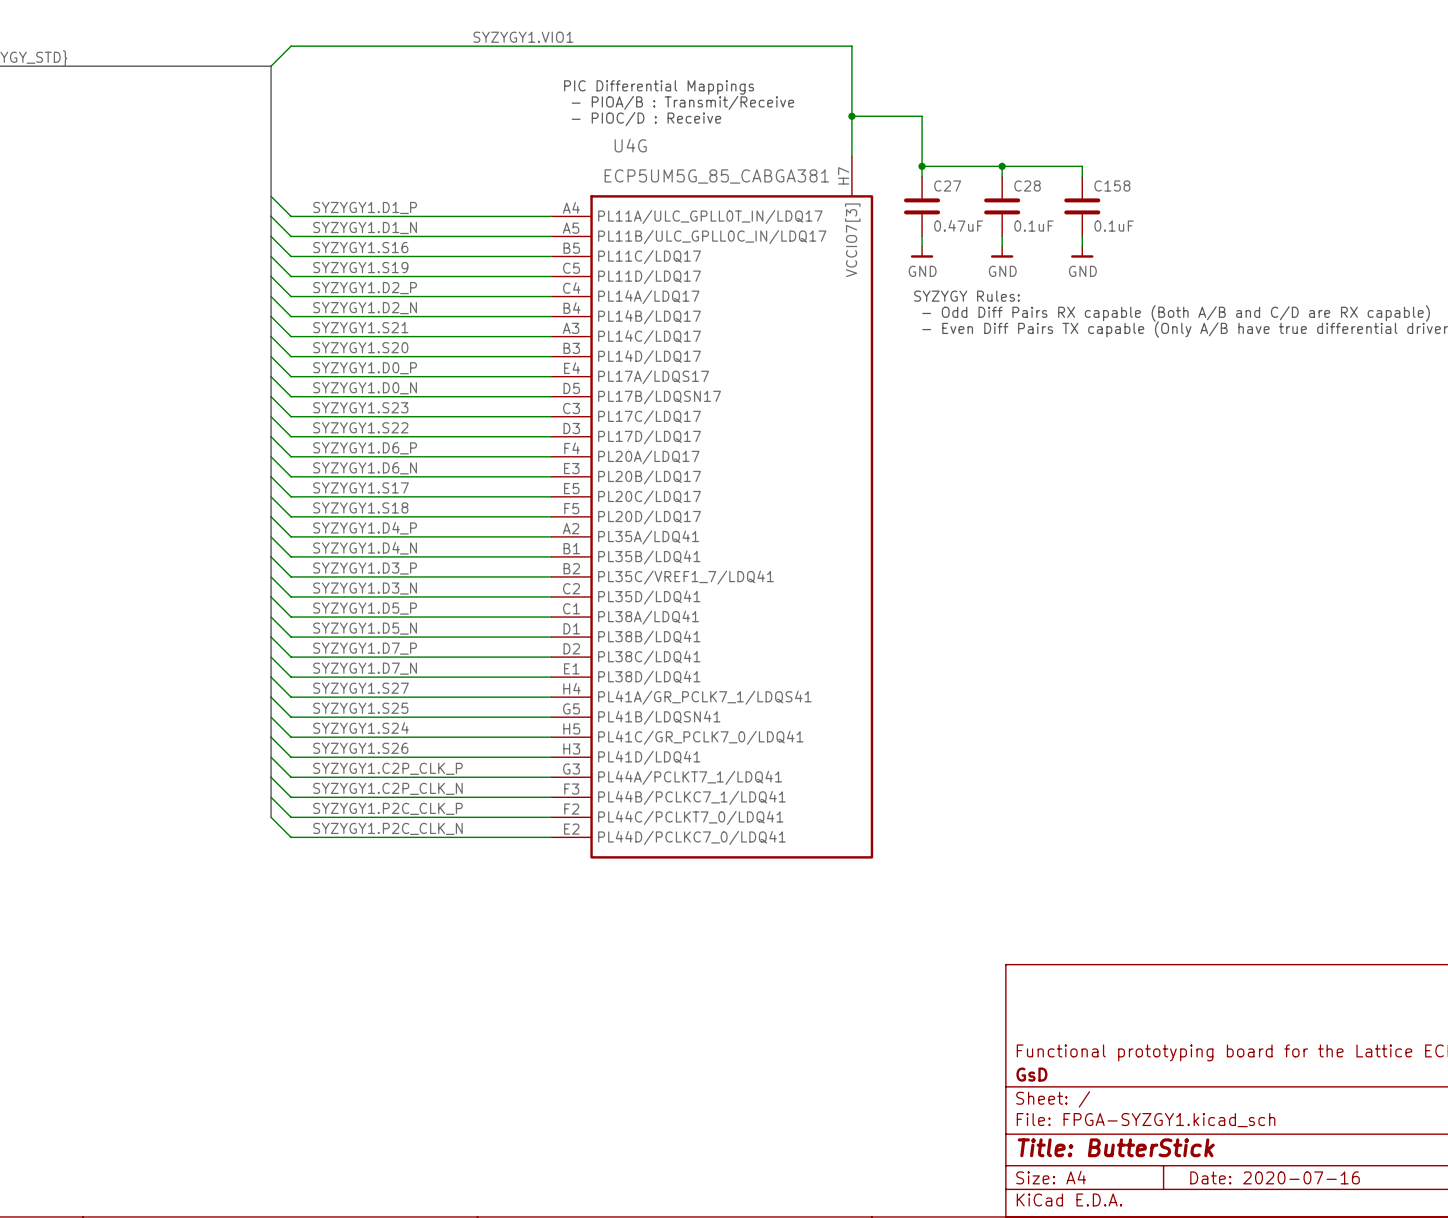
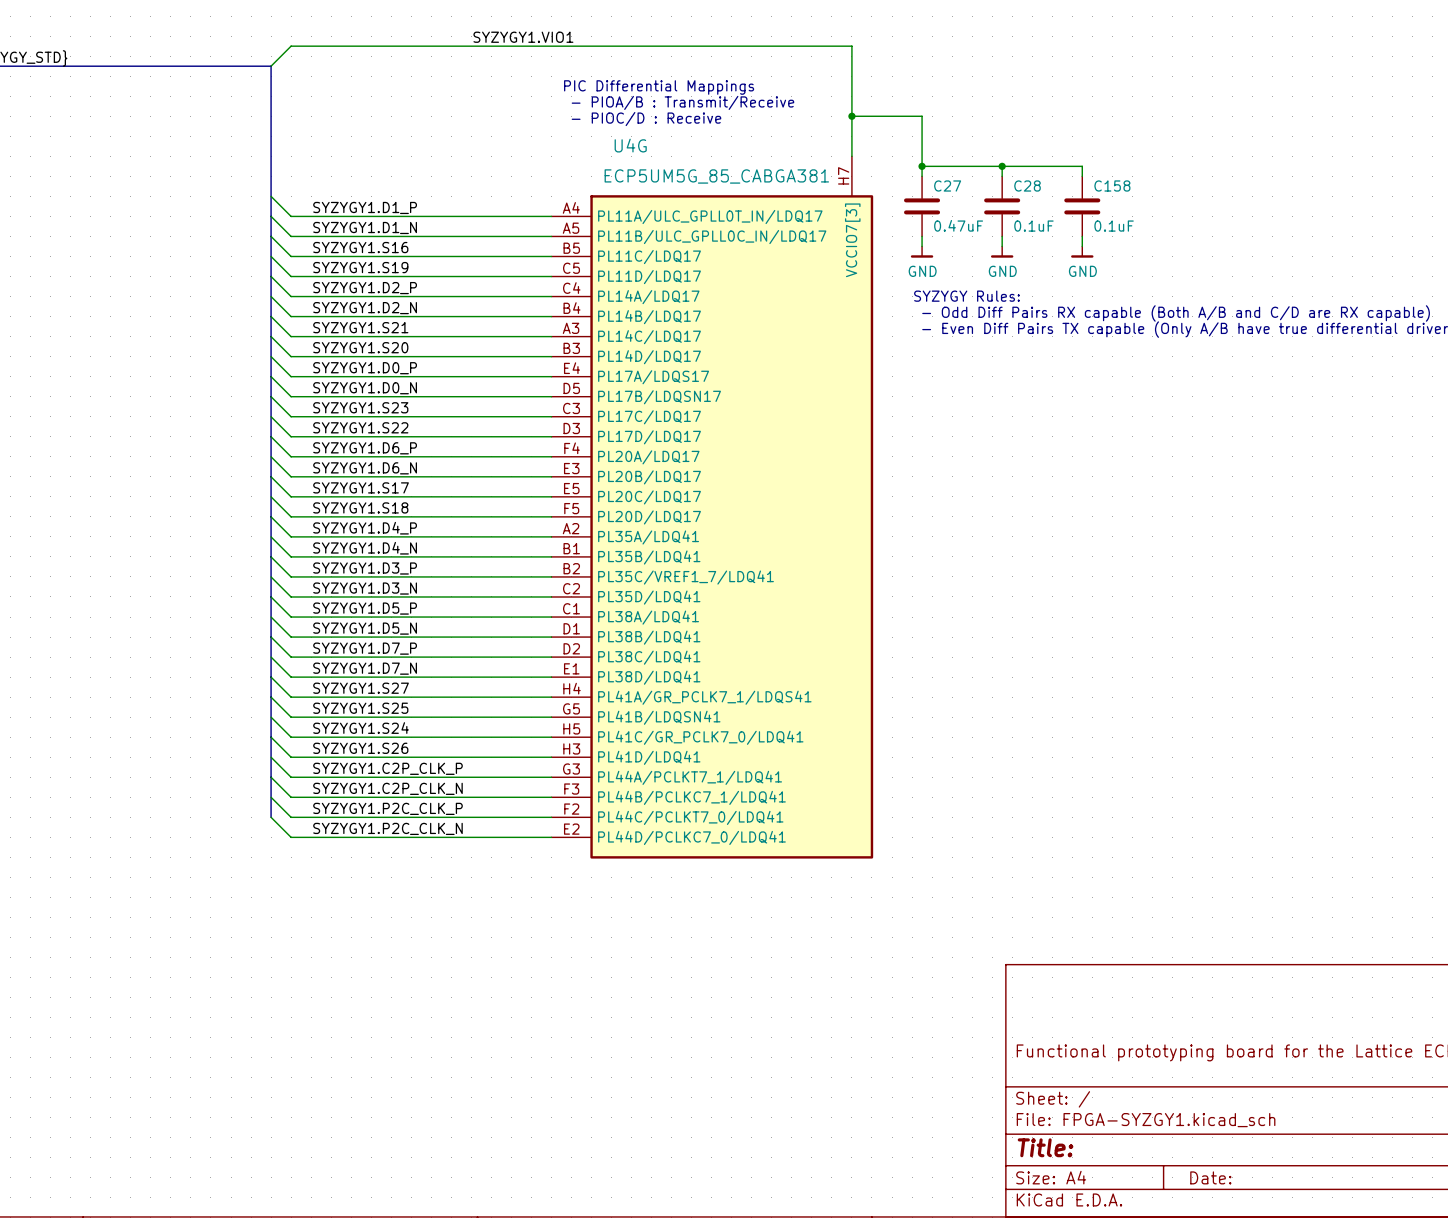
title block: GsD (1031, 1074) -> none
title block: Title: ButterStick (1116, 1147) -> Title: (1045, 1147)
title block: Date: 2020-07-16 (1275, 1177) -> Date: (1210, 1177)

